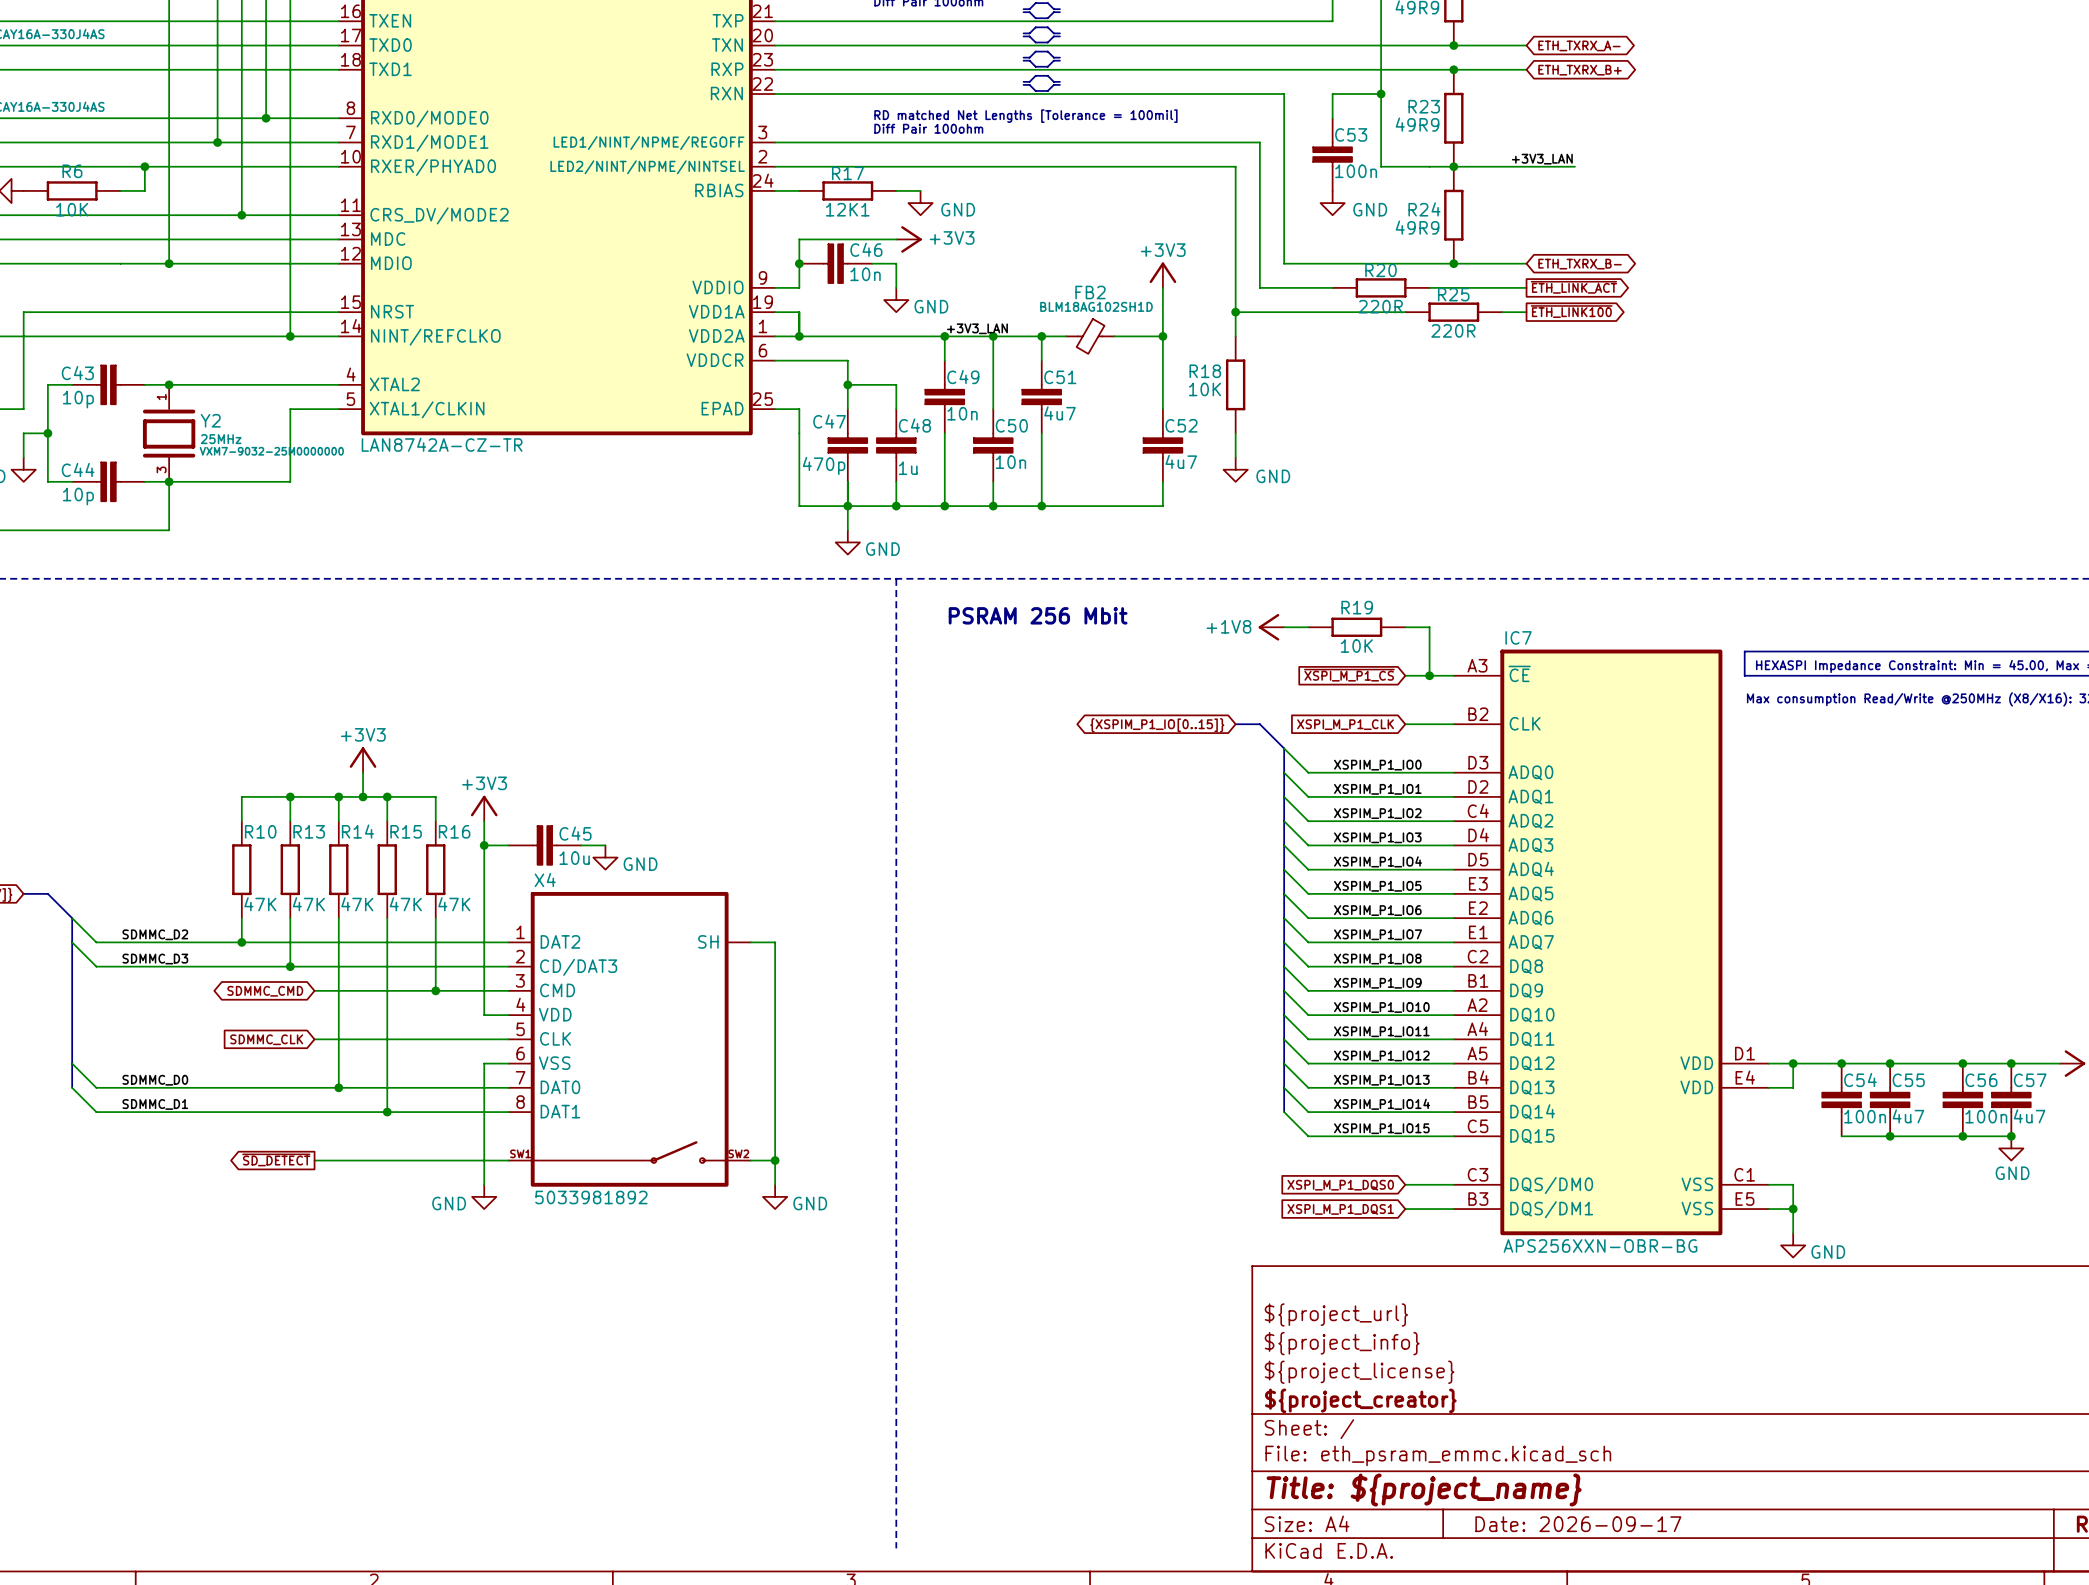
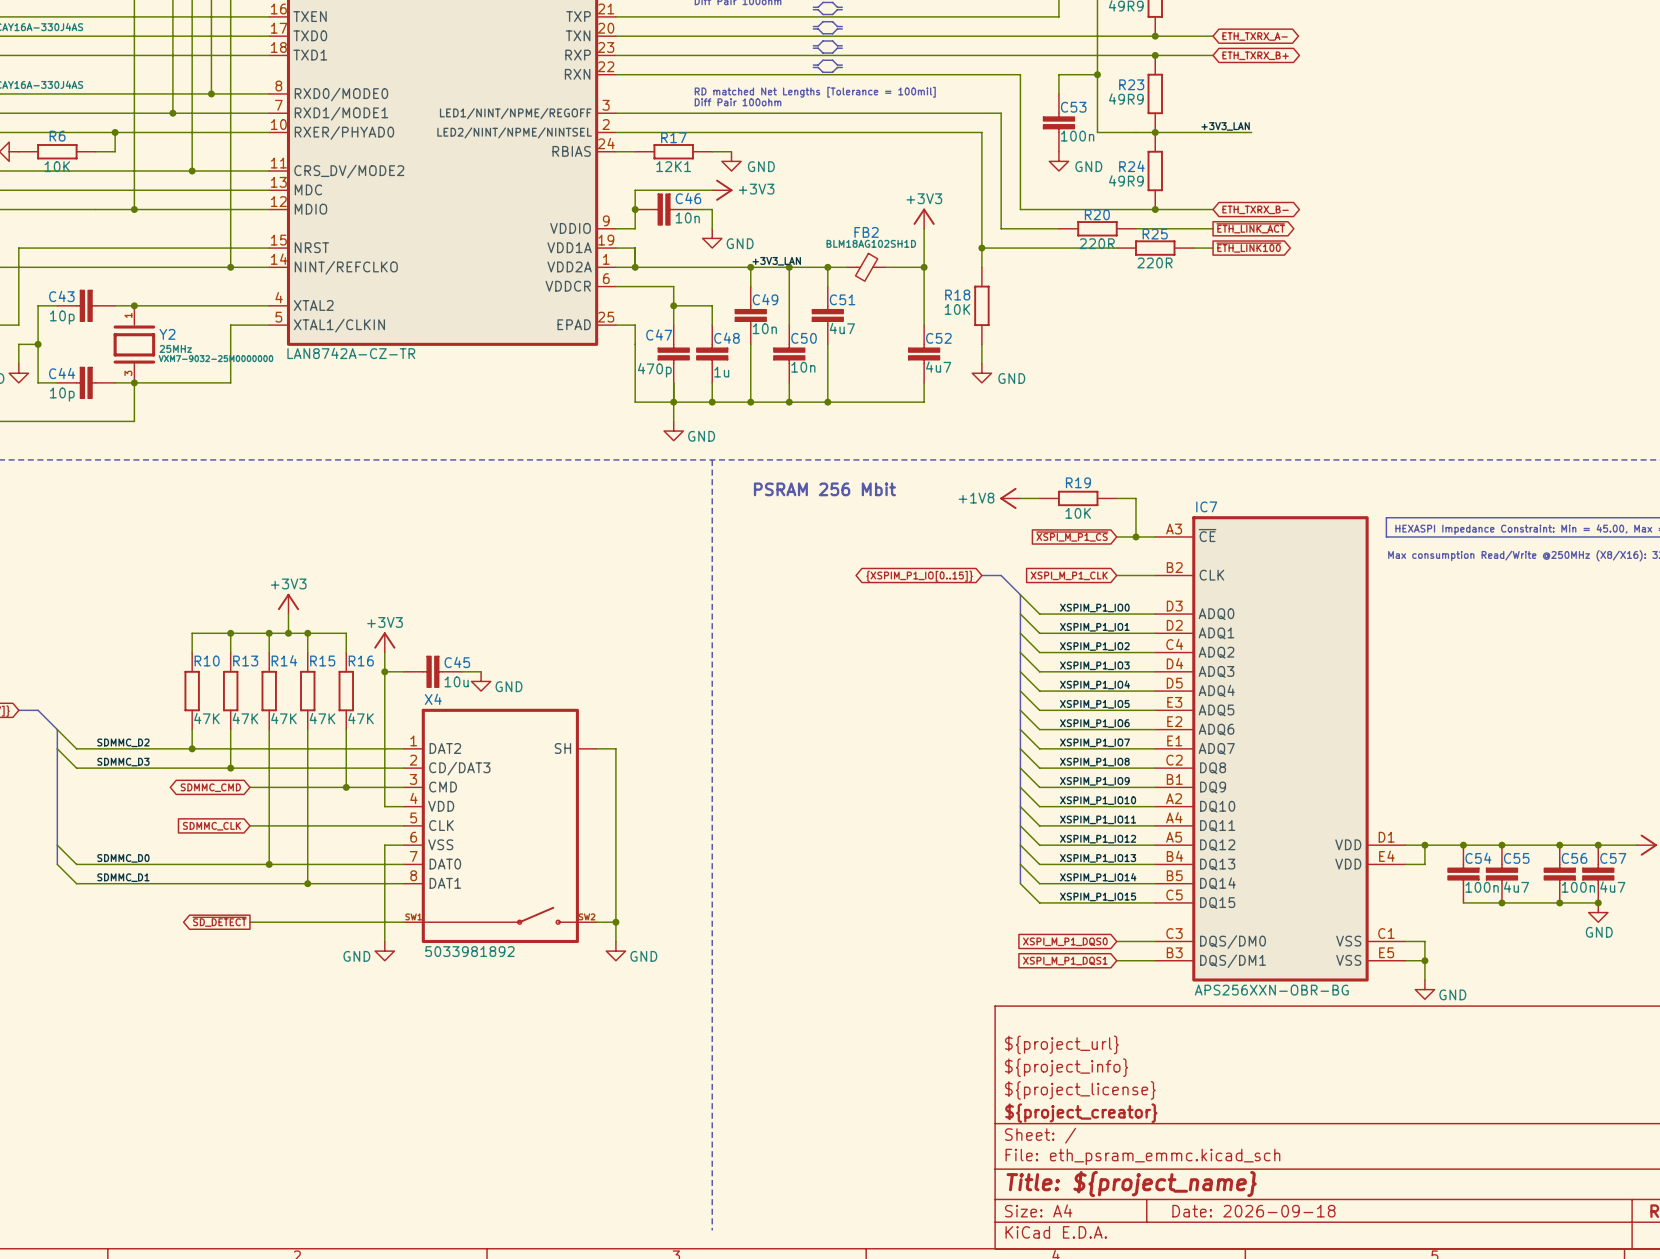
title block: Date: 2026-09-17 (1578, 1524) -> Date: 2026-09-18 (1253, 1211)

